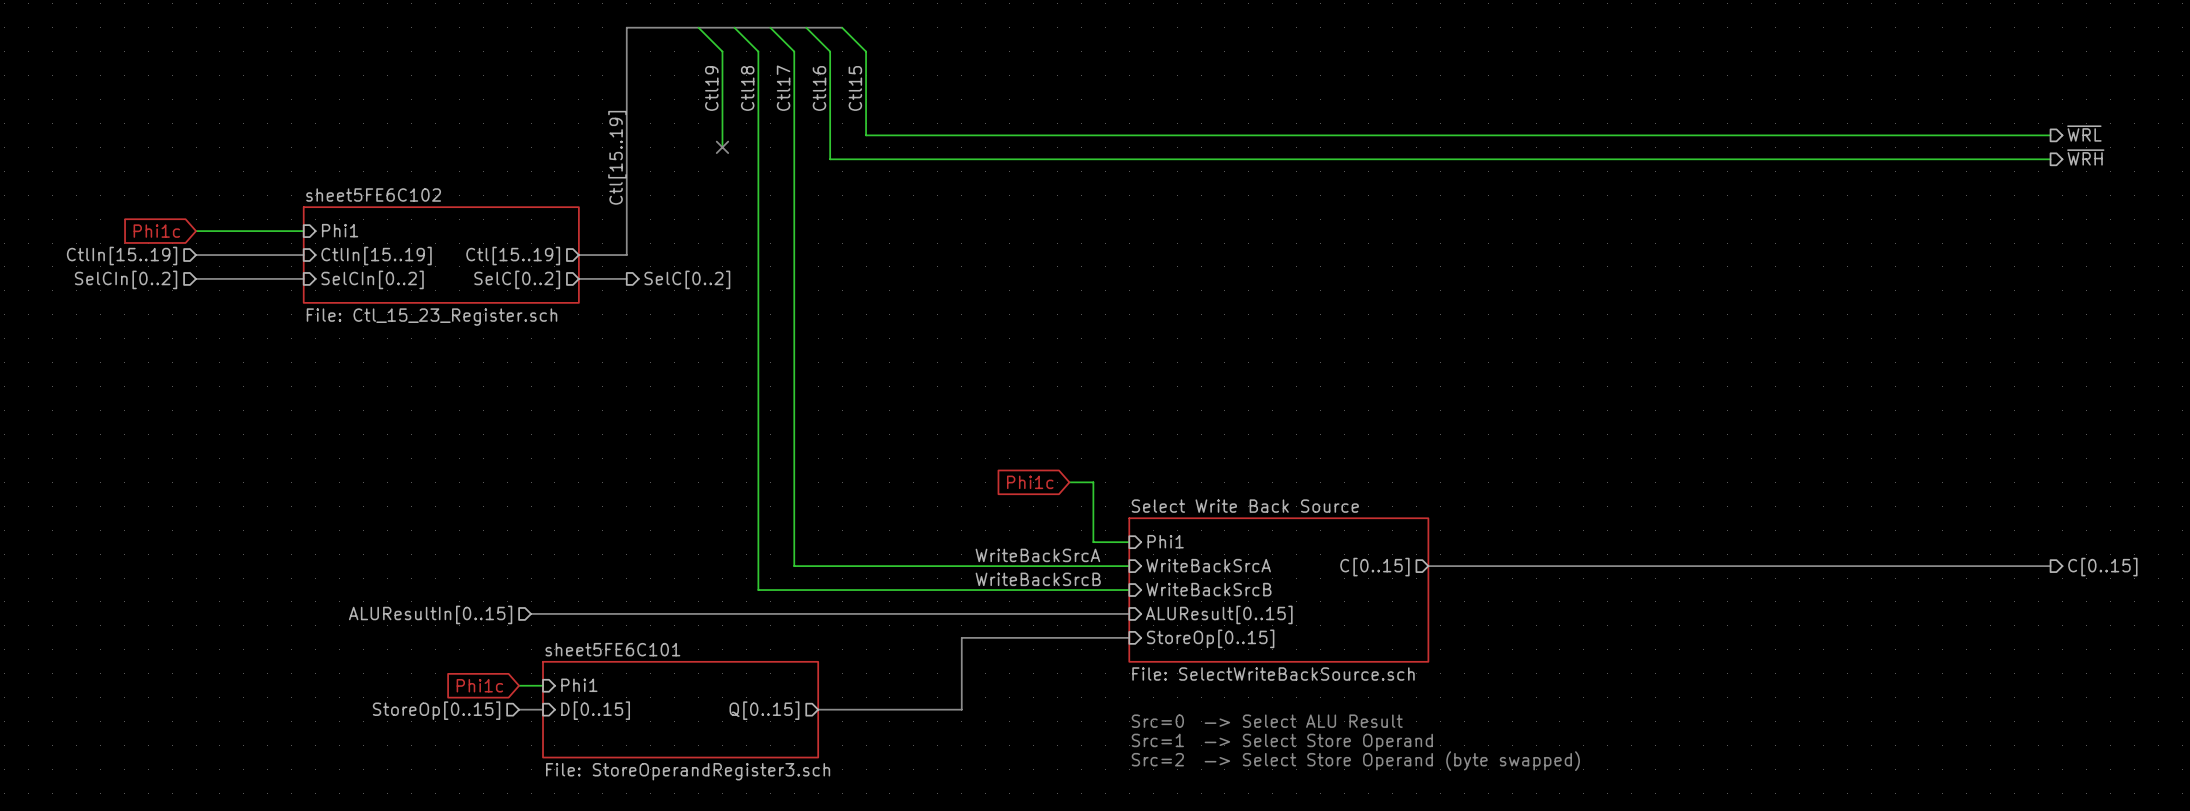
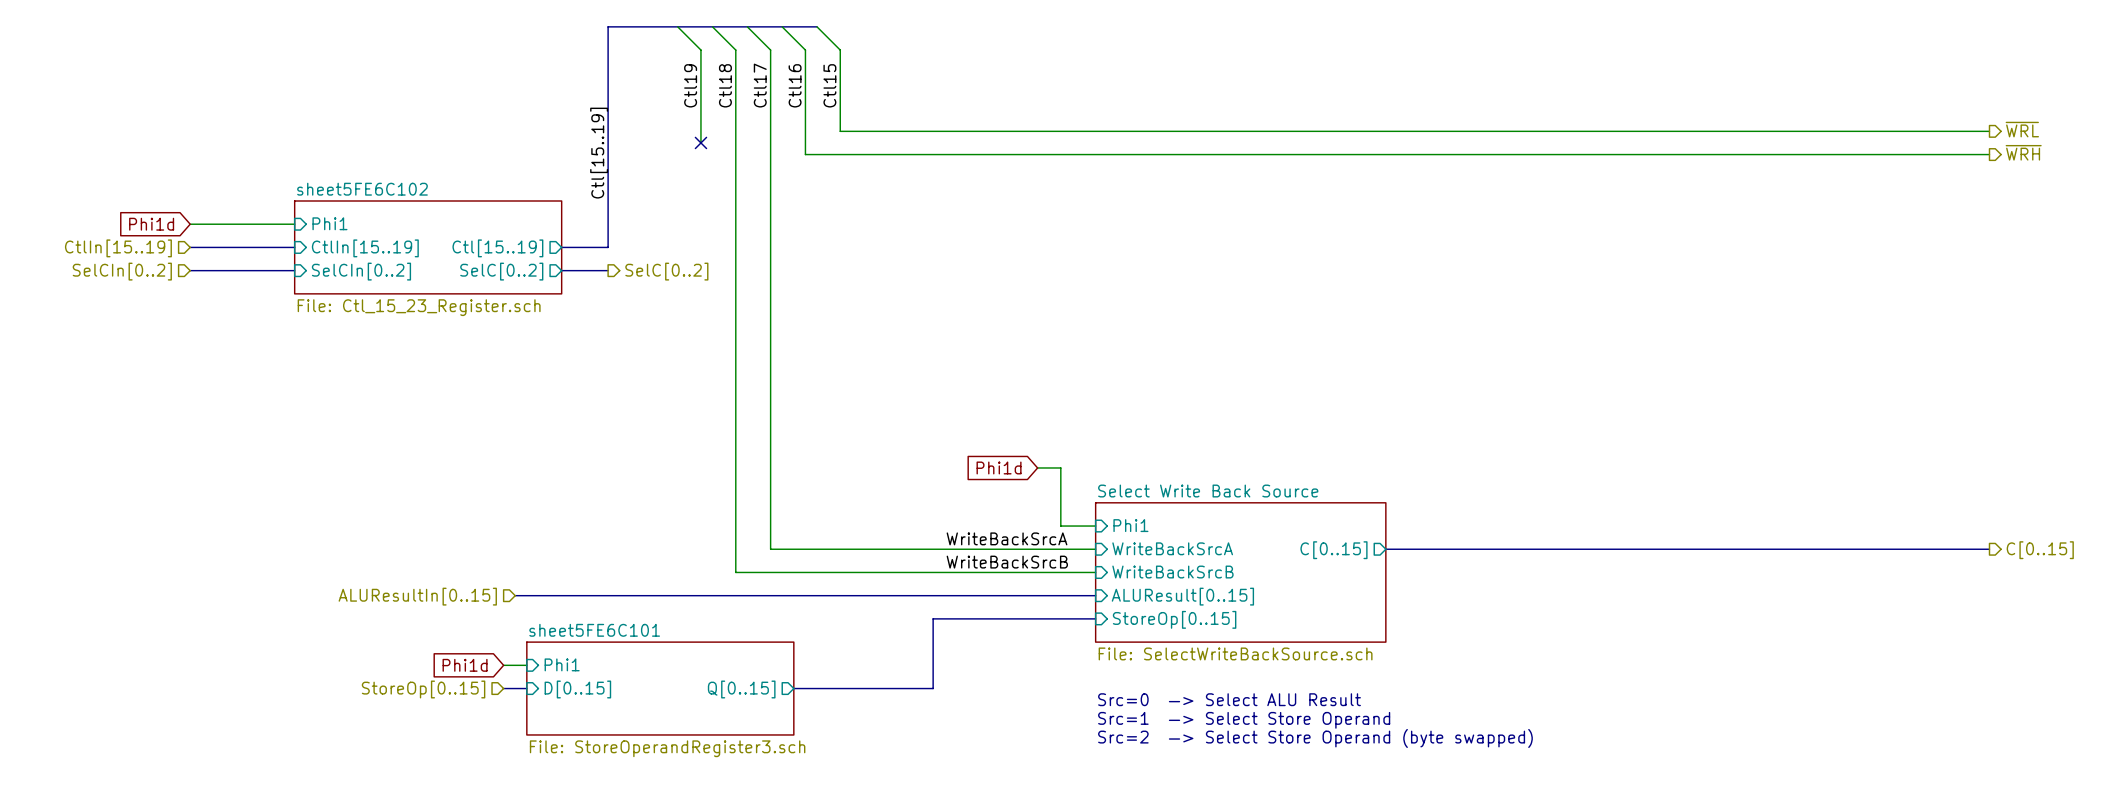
global label: Phi1c (156, 231) -> Phi1d (151, 224)
global label: Phi1c (1030, 482) -> Phi1d (999, 467)
global label: Phi1c (479, 685) -> Phi1d (465, 665)

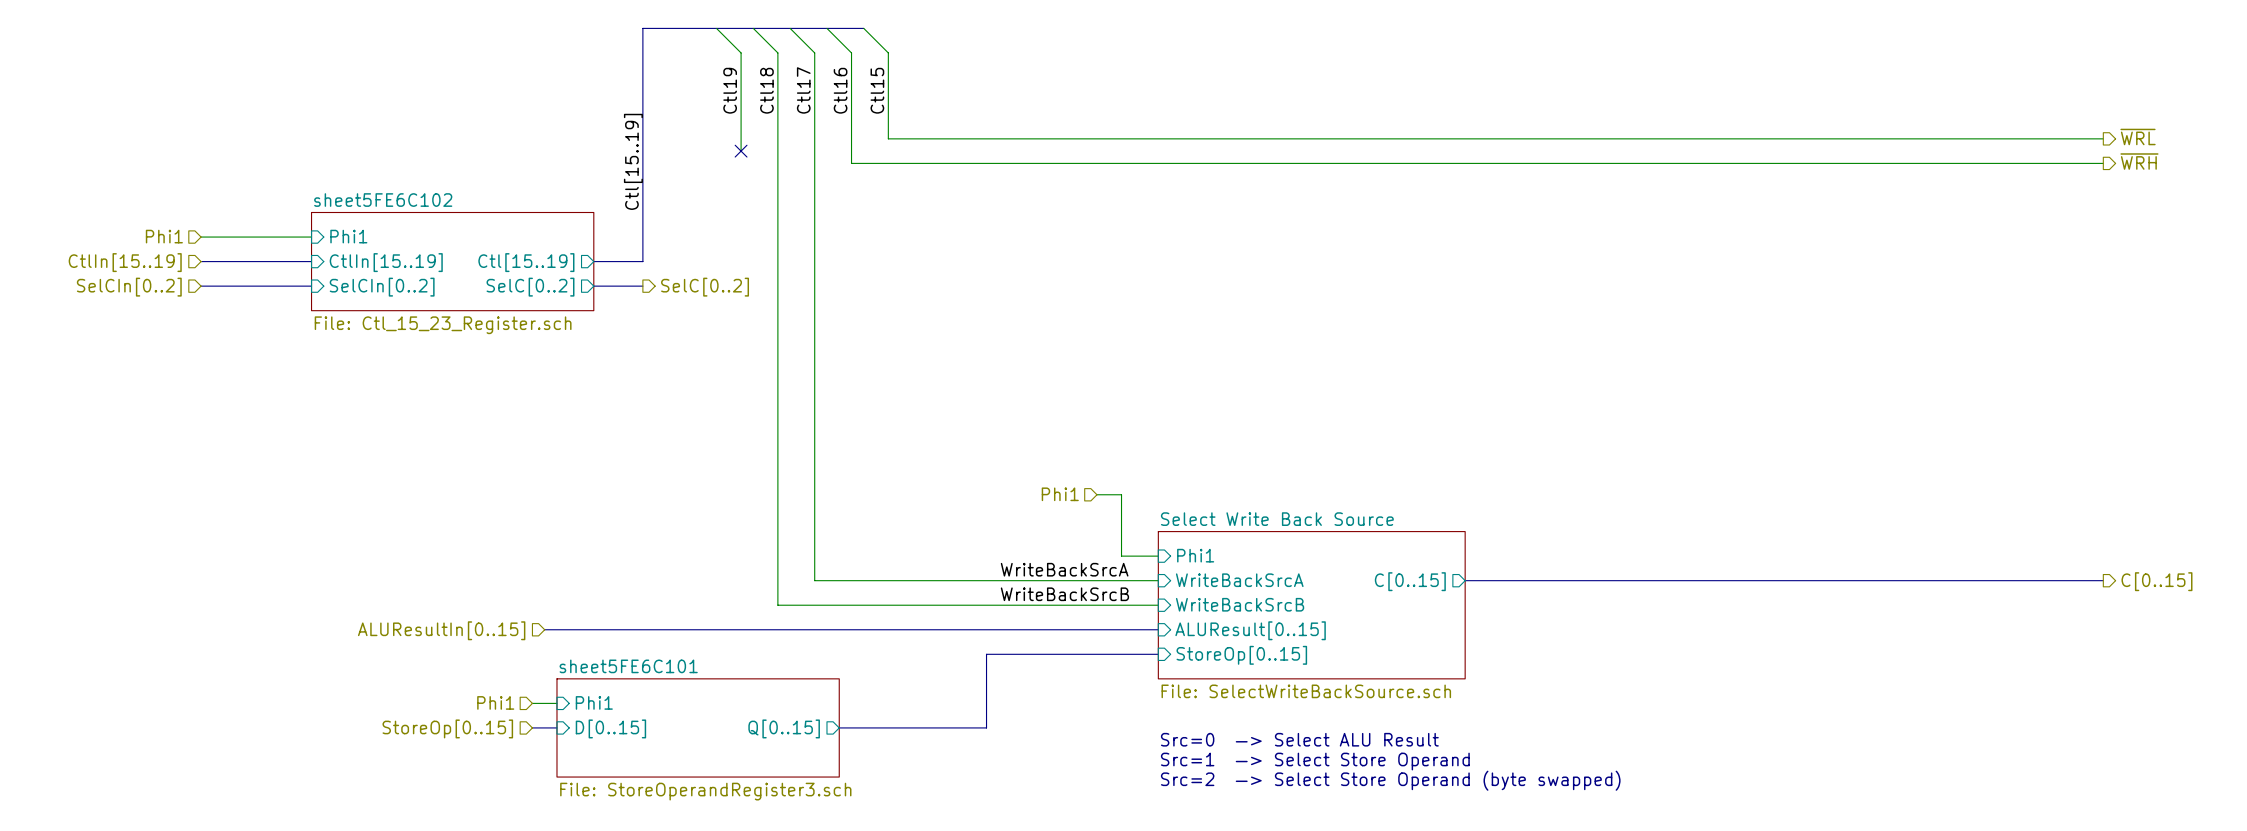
hierarchical label: none -> Phi1 (164, 236)
global label: Phi1d (151, 224) -> none
global label: Phi1d (999, 467) -> none
hierarchical label: none -> Phi1 (1060, 494)
hierarchical label: none -> Phi1 (495, 702)
global label: Phi1d (465, 665) -> none

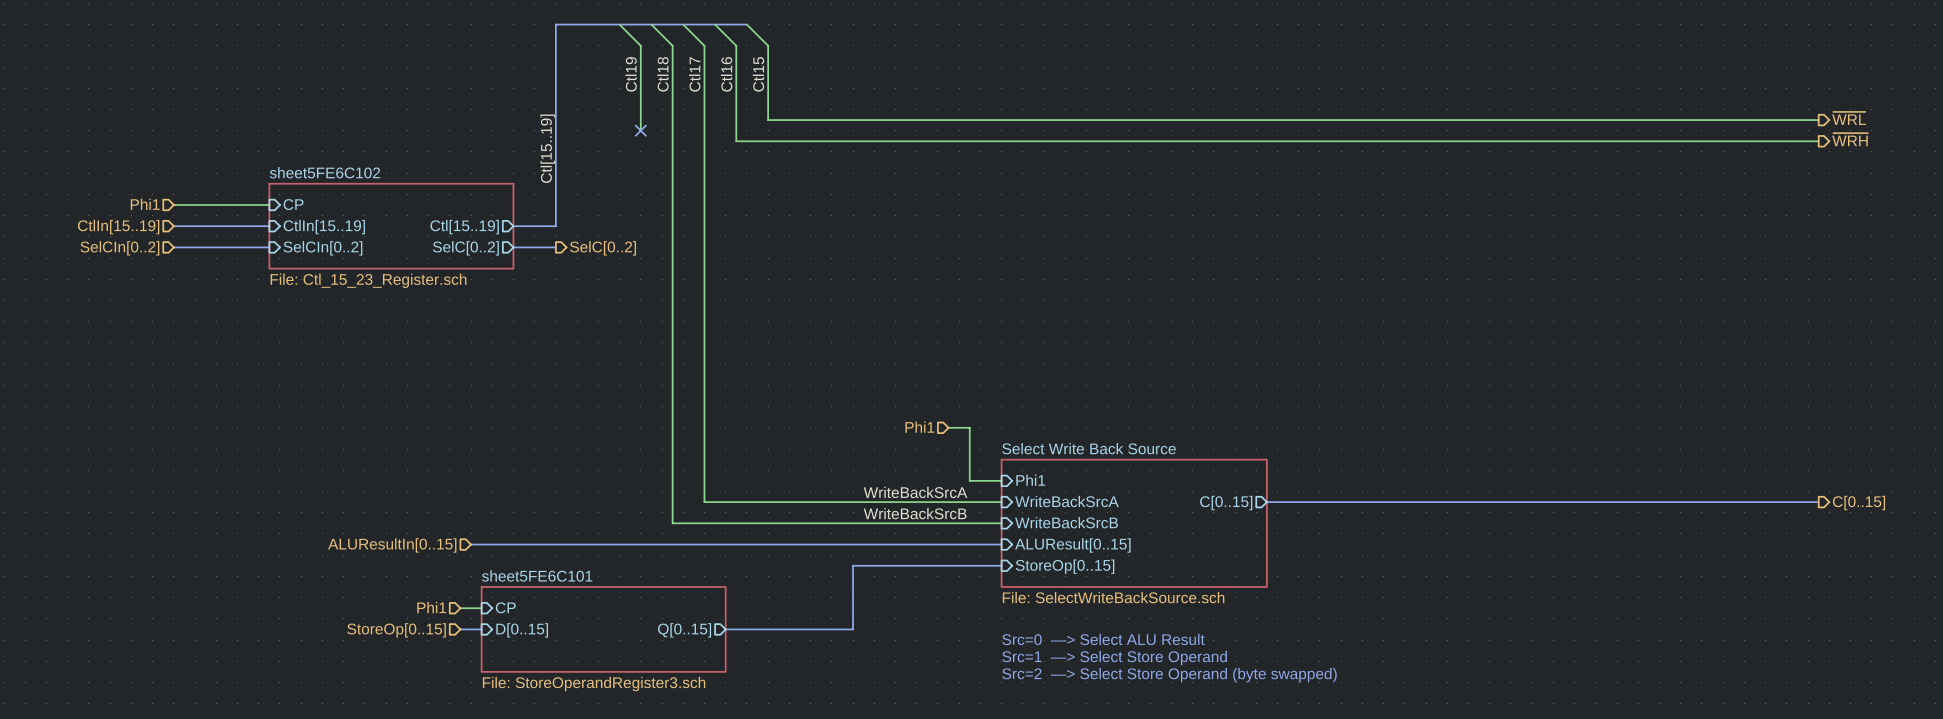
sheet pin: Phi1 (348, 236) -> CP (293, 204)
sheet pin: Phi1 (594, 702) -> CP (505, 607)

